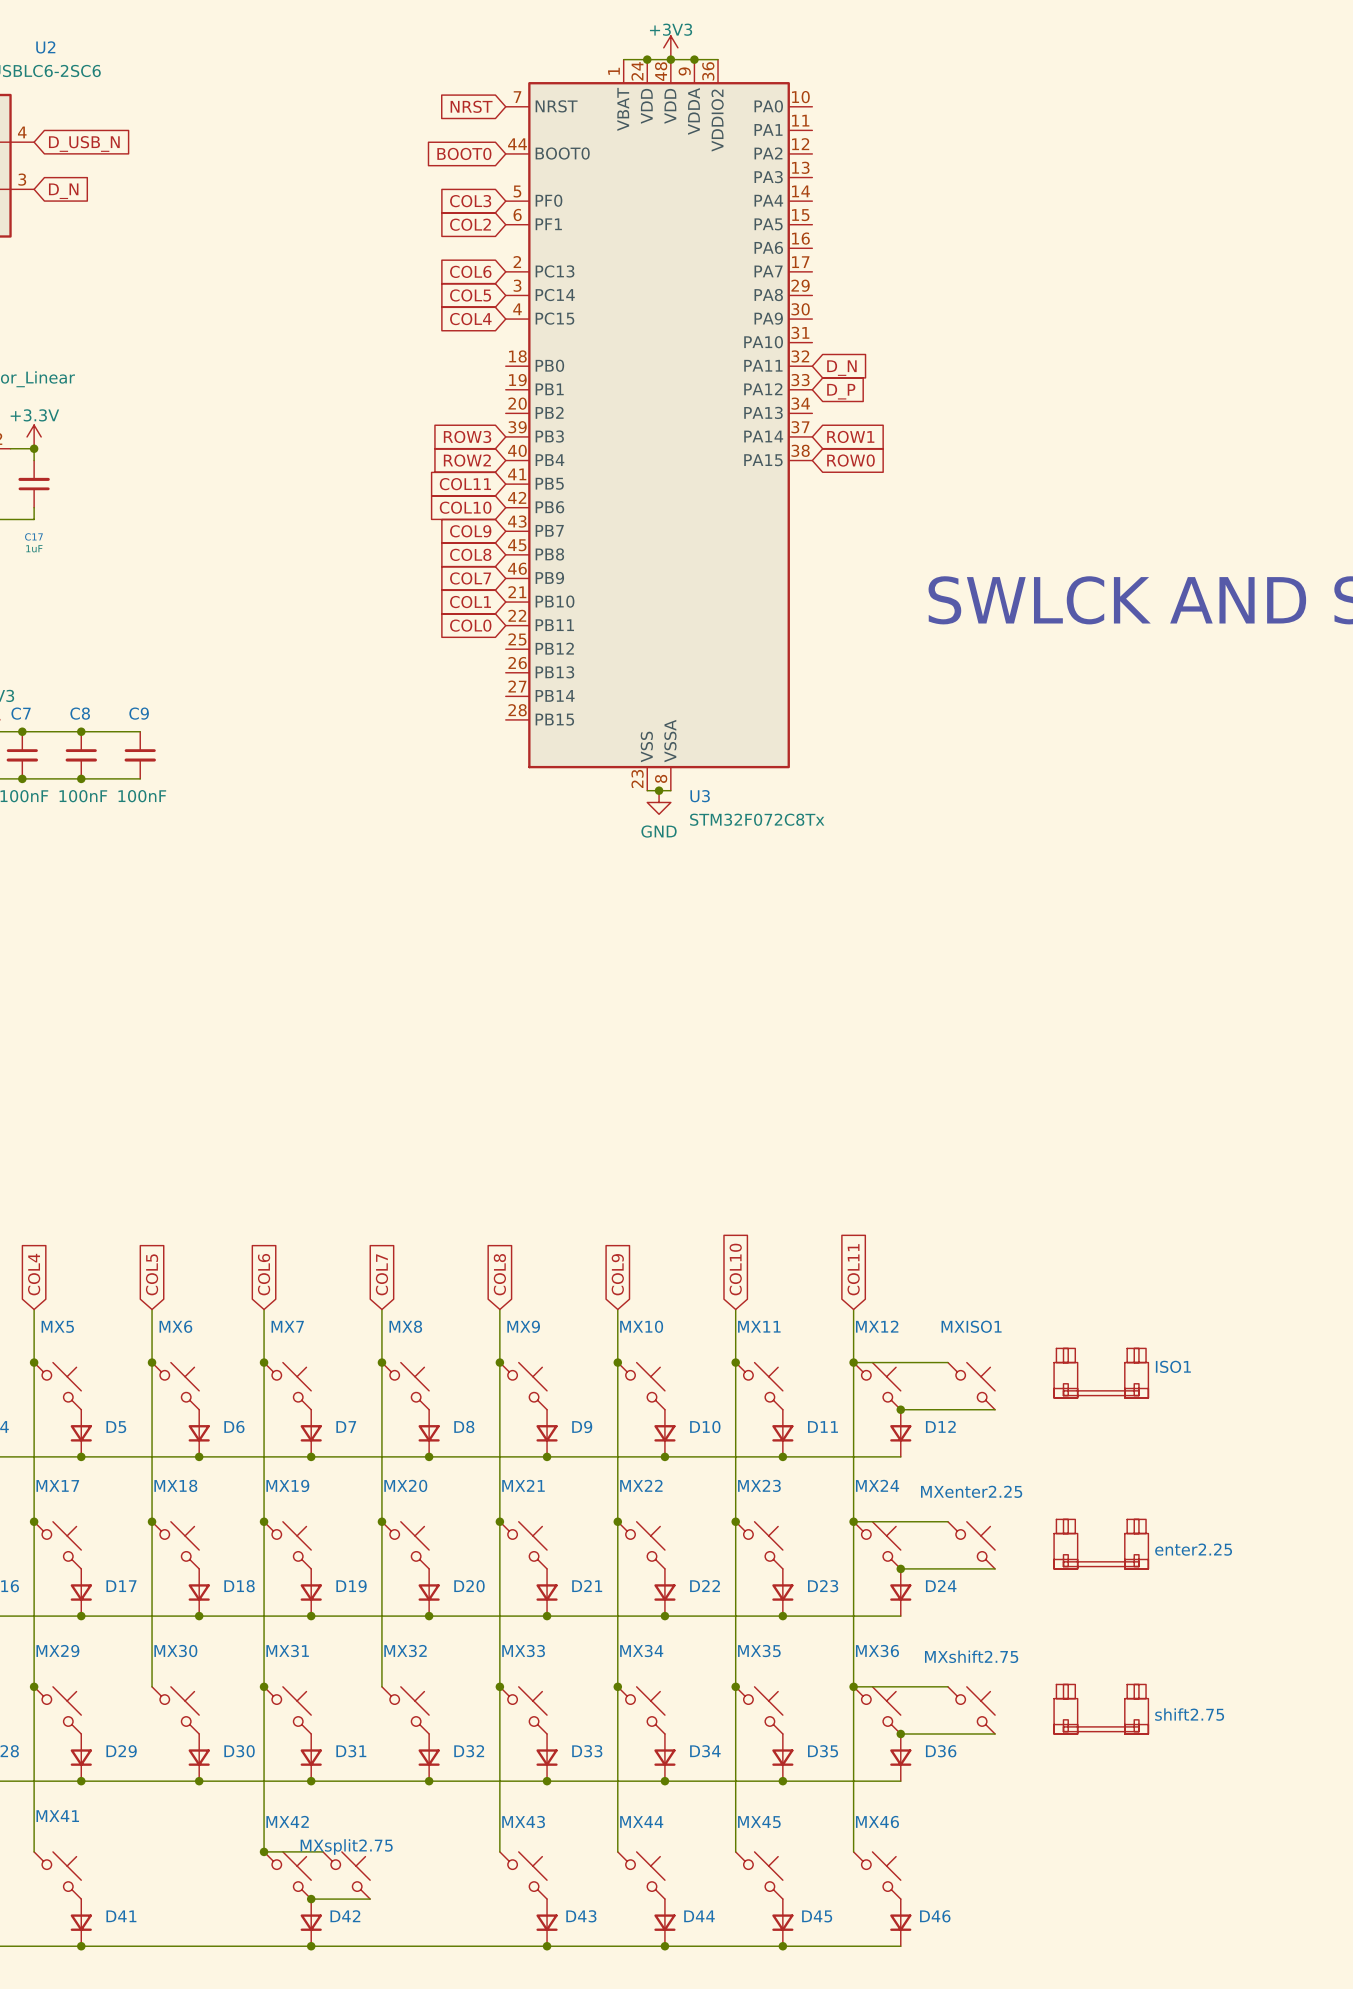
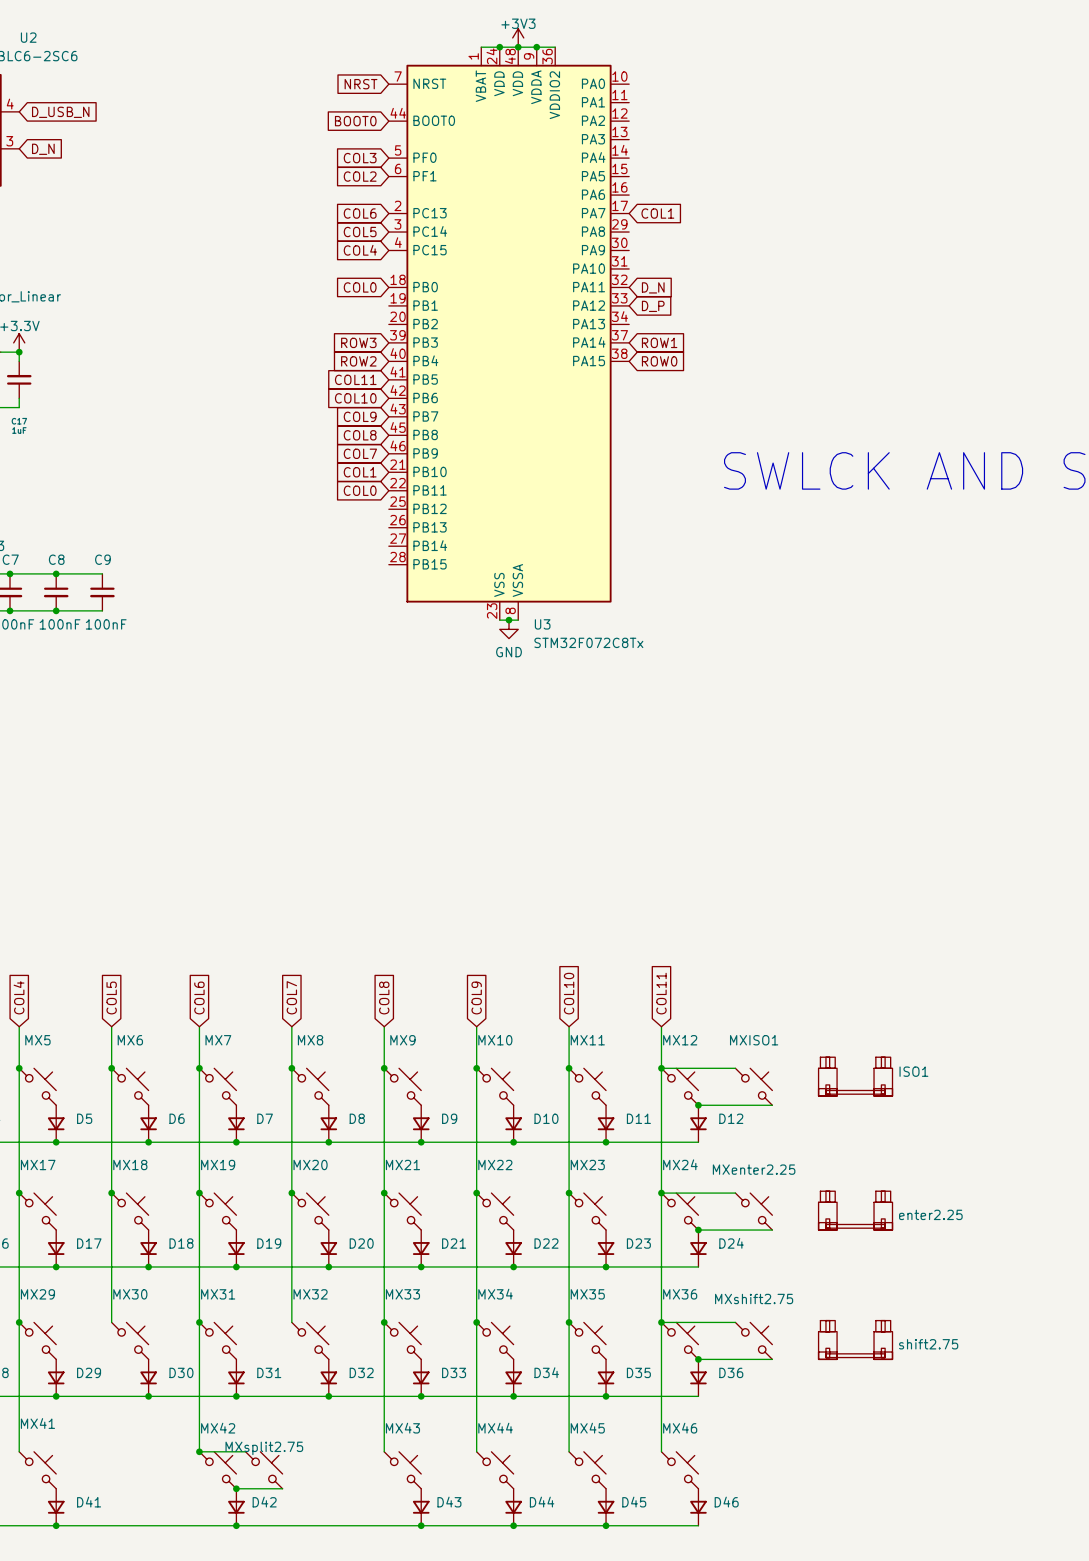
global label: none -> COL1 (657, 213)
global label: none -> COL0 (360, 287)

